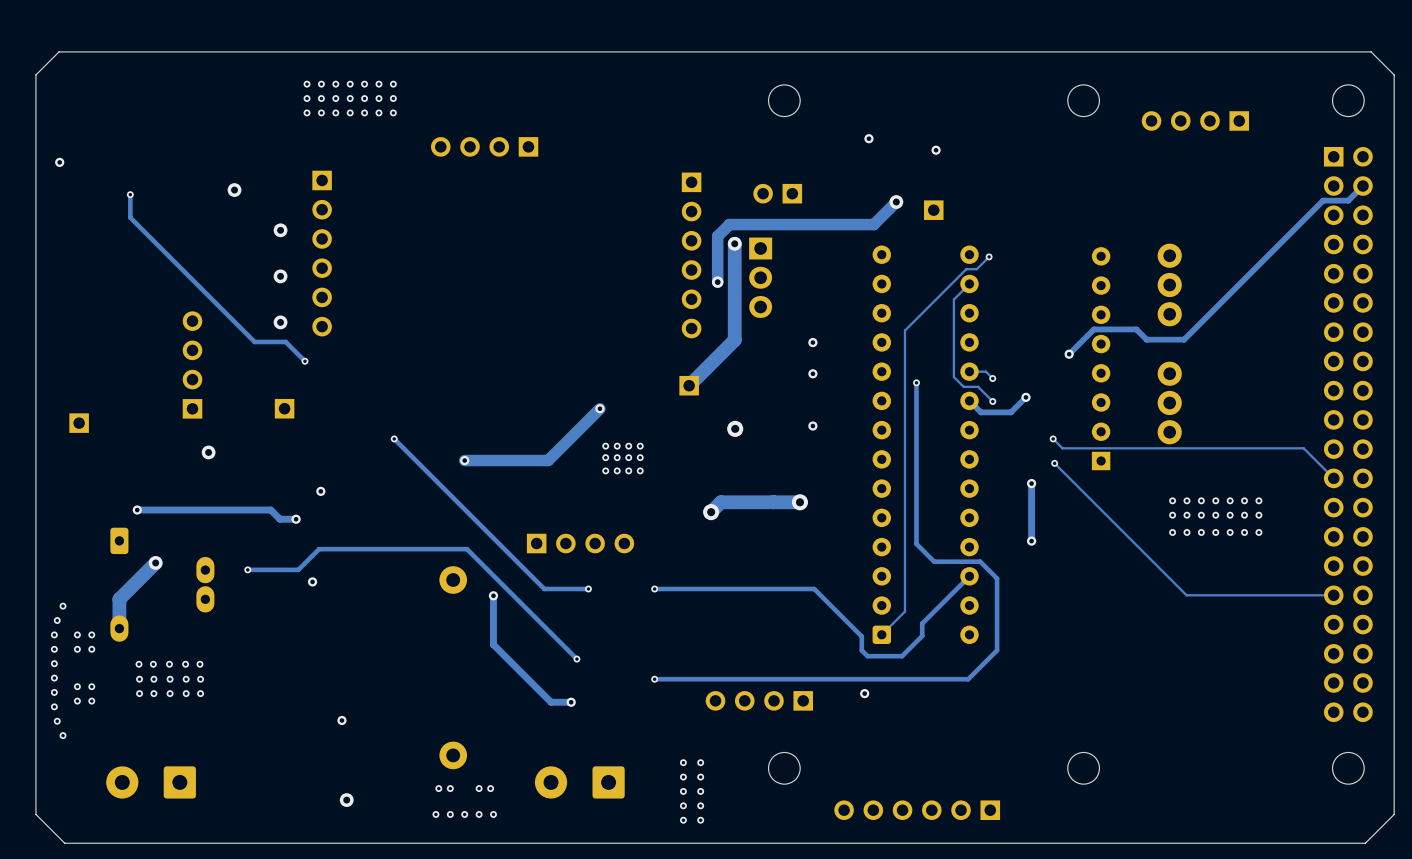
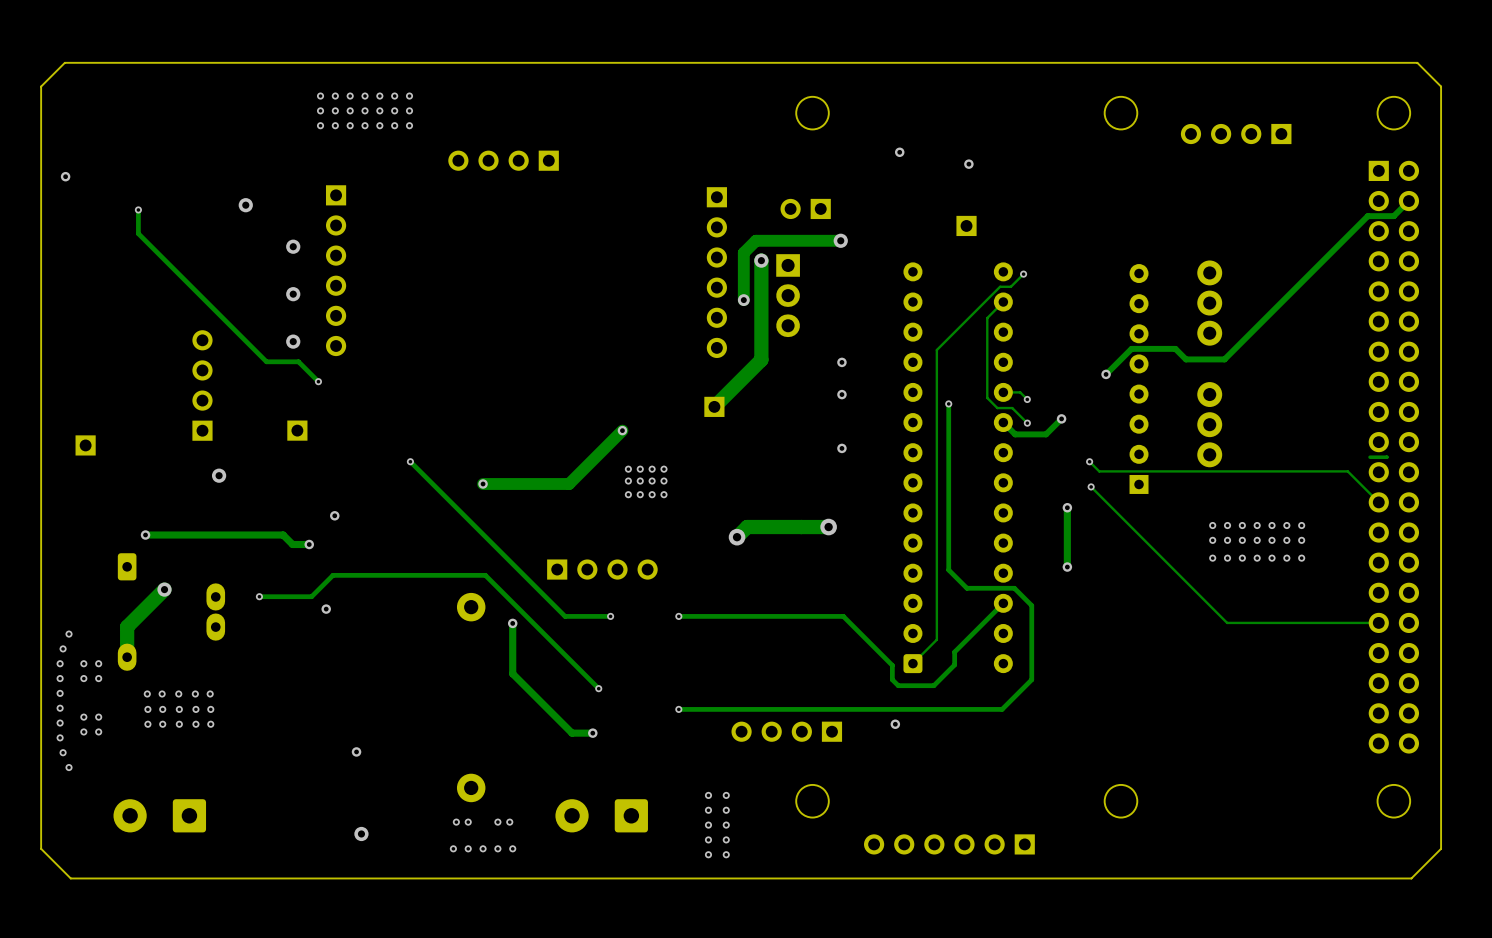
track: (896, 202) (873, 224) (811, 224) -> none
via: (896, 202) -> none
via: none -> (840, 240)
via: (735, 428) -> none
track: none -> (1386, 457) (1370, 457)

